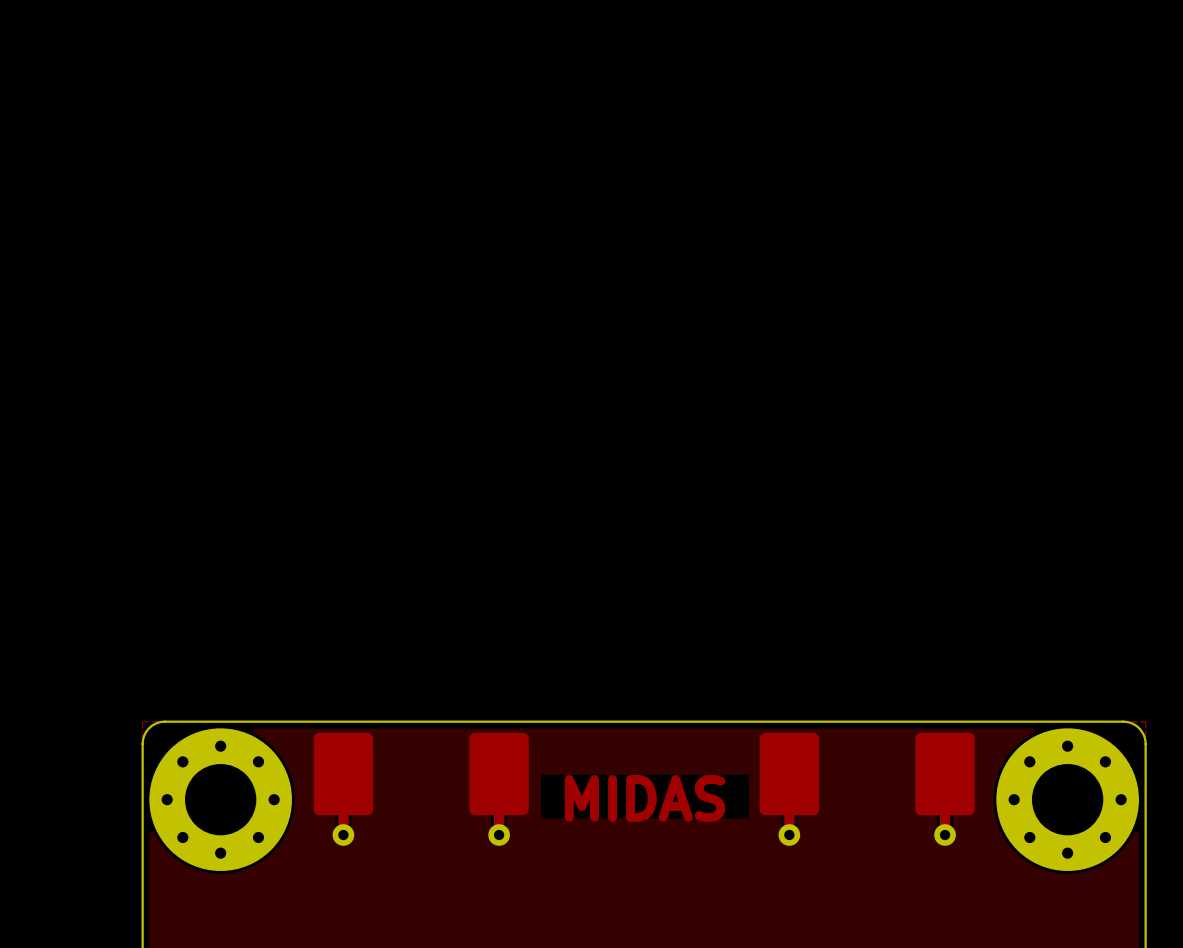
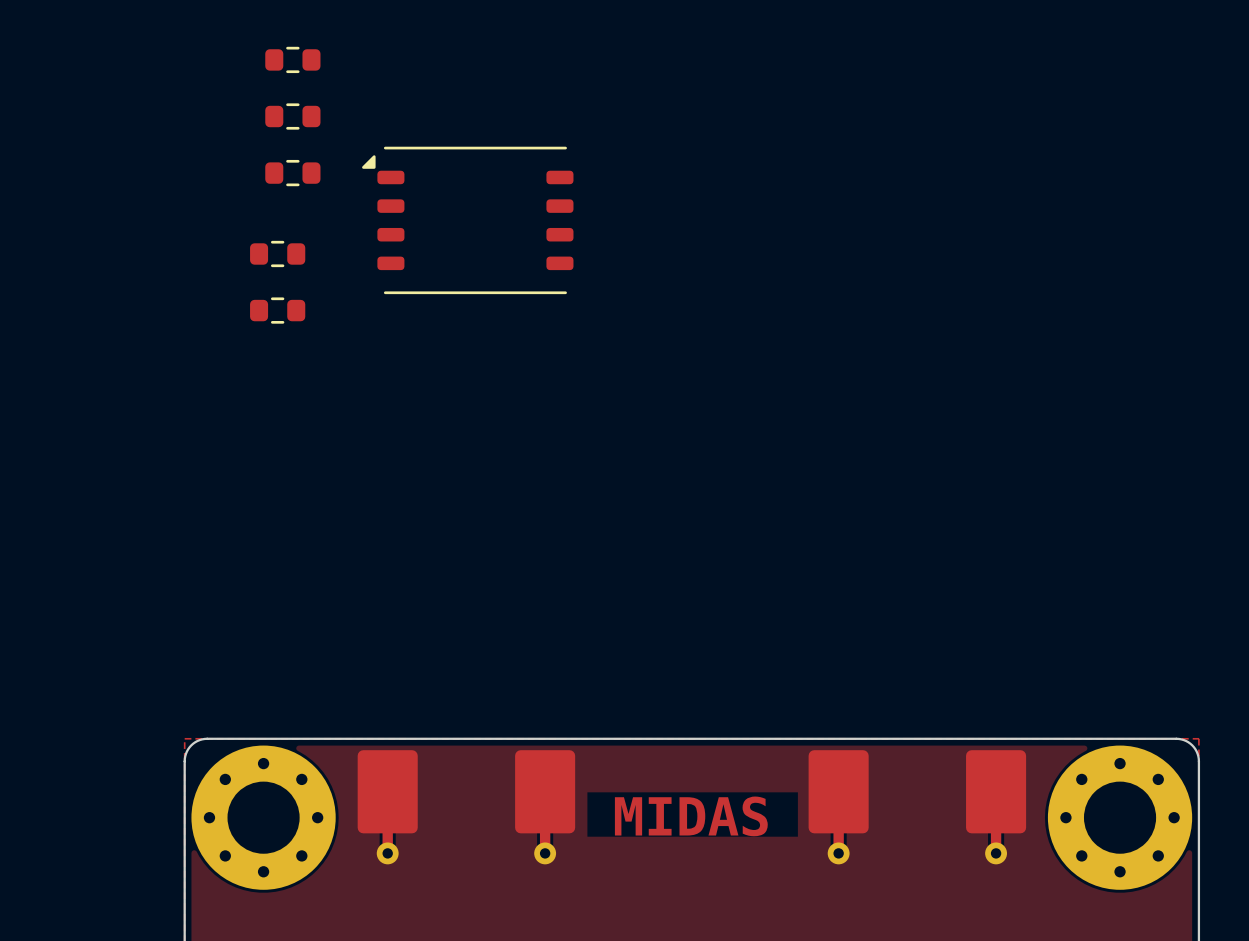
part: none -> (292, 59)
part: none -> (292, 116)
part: none -> (292, 173)
part: none -> (467, 220)
part: none -> (277, 253)
part: none -> (277, 310)

